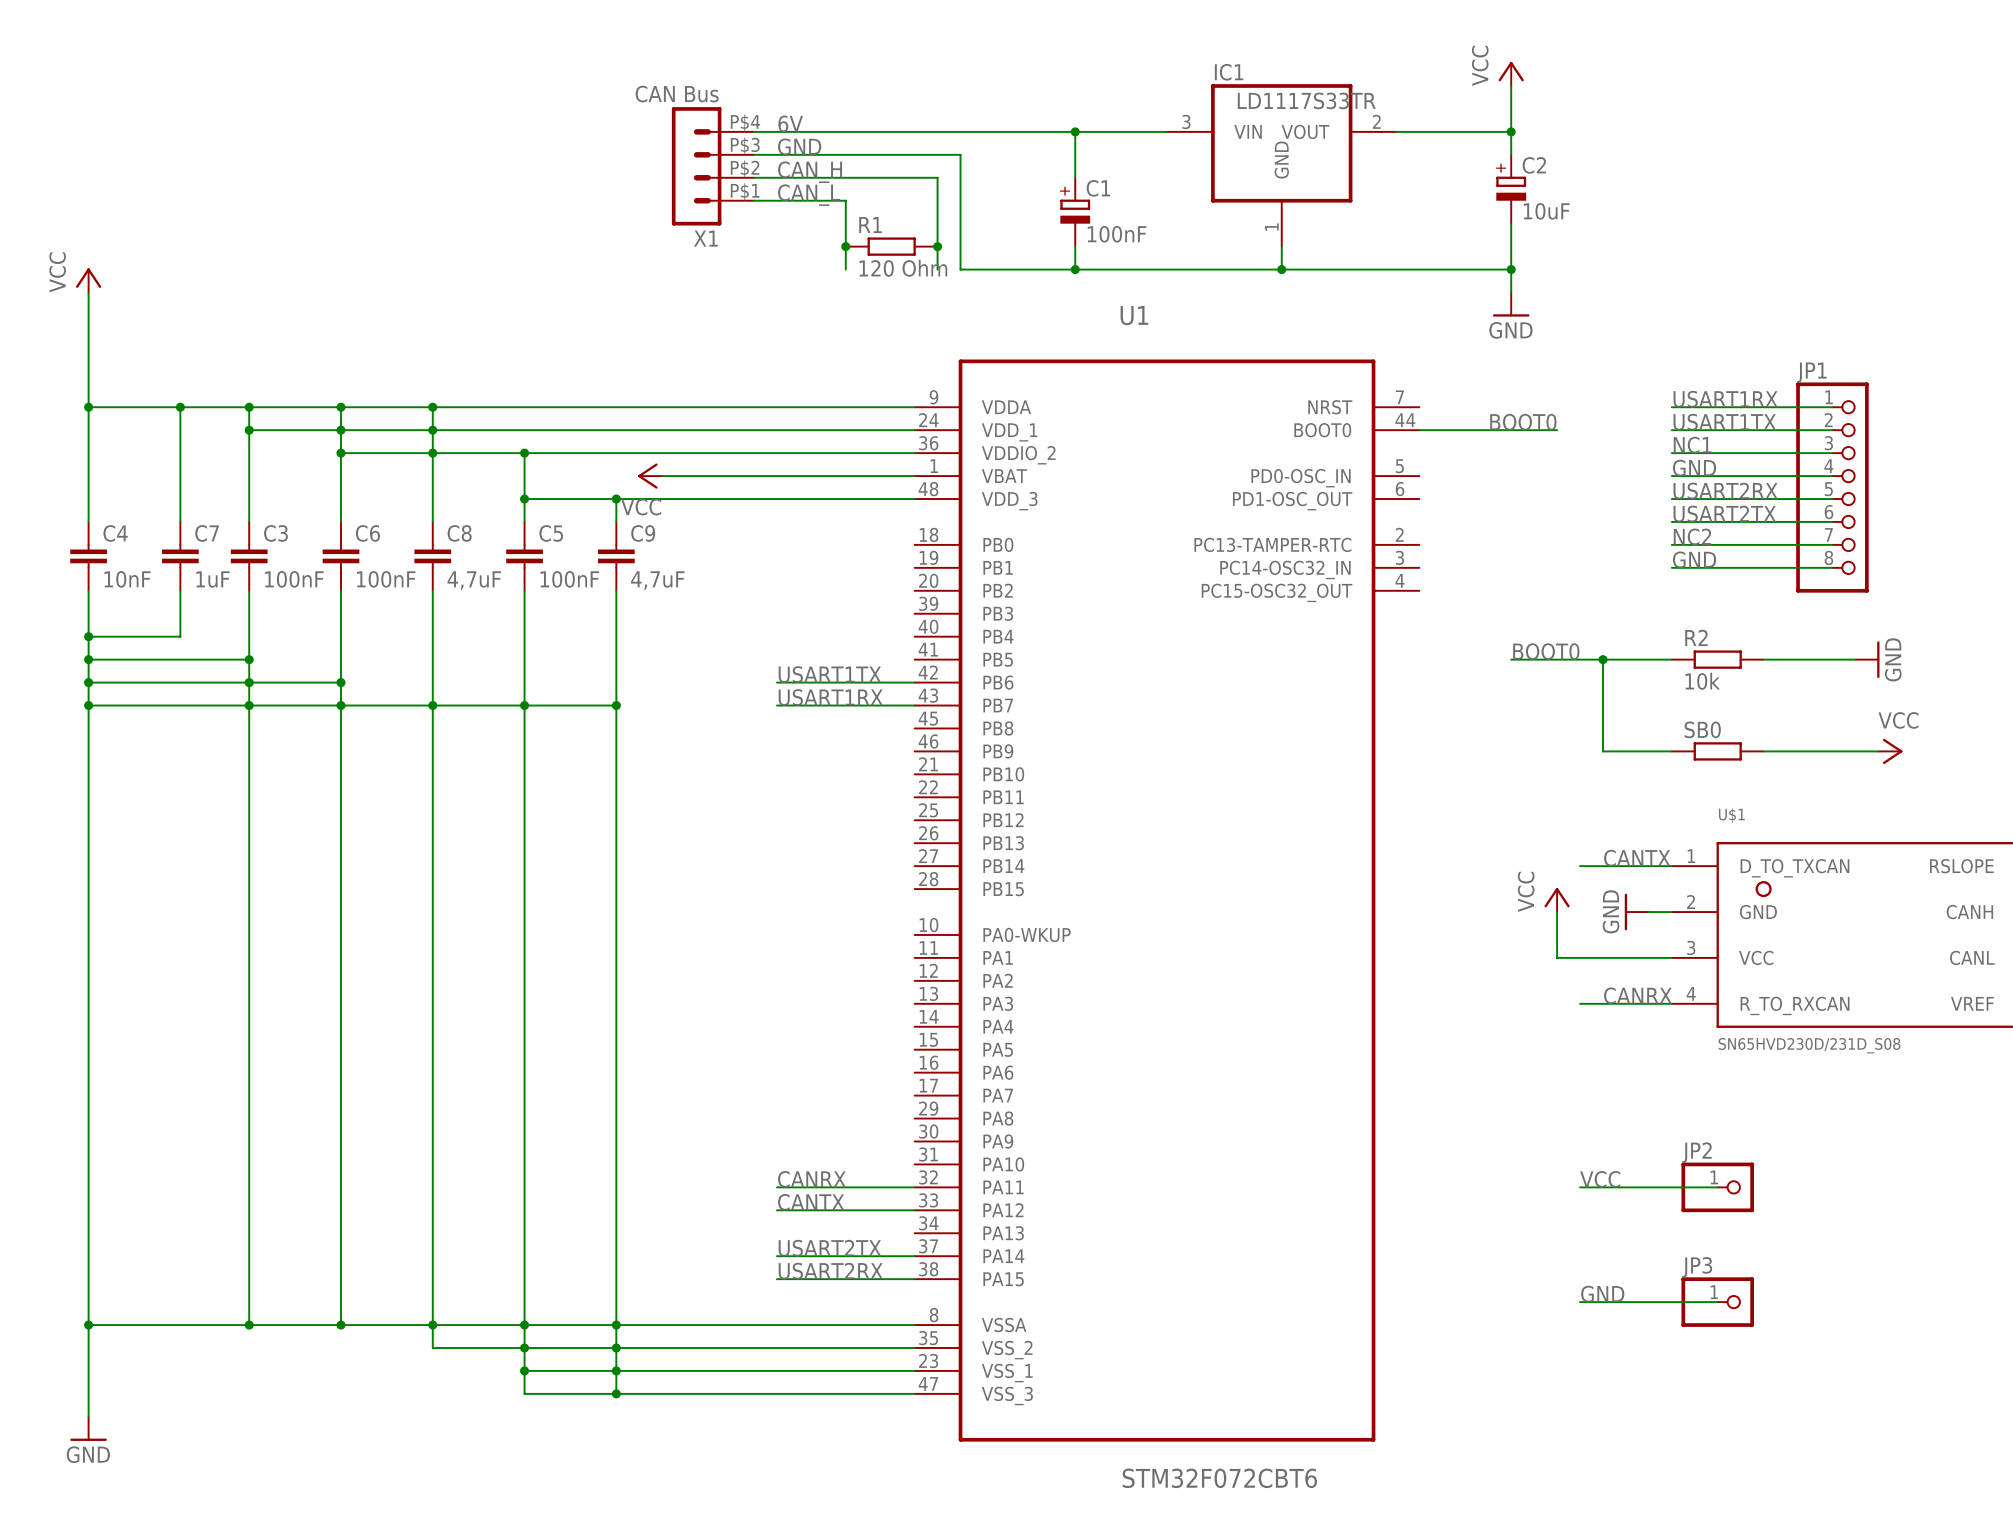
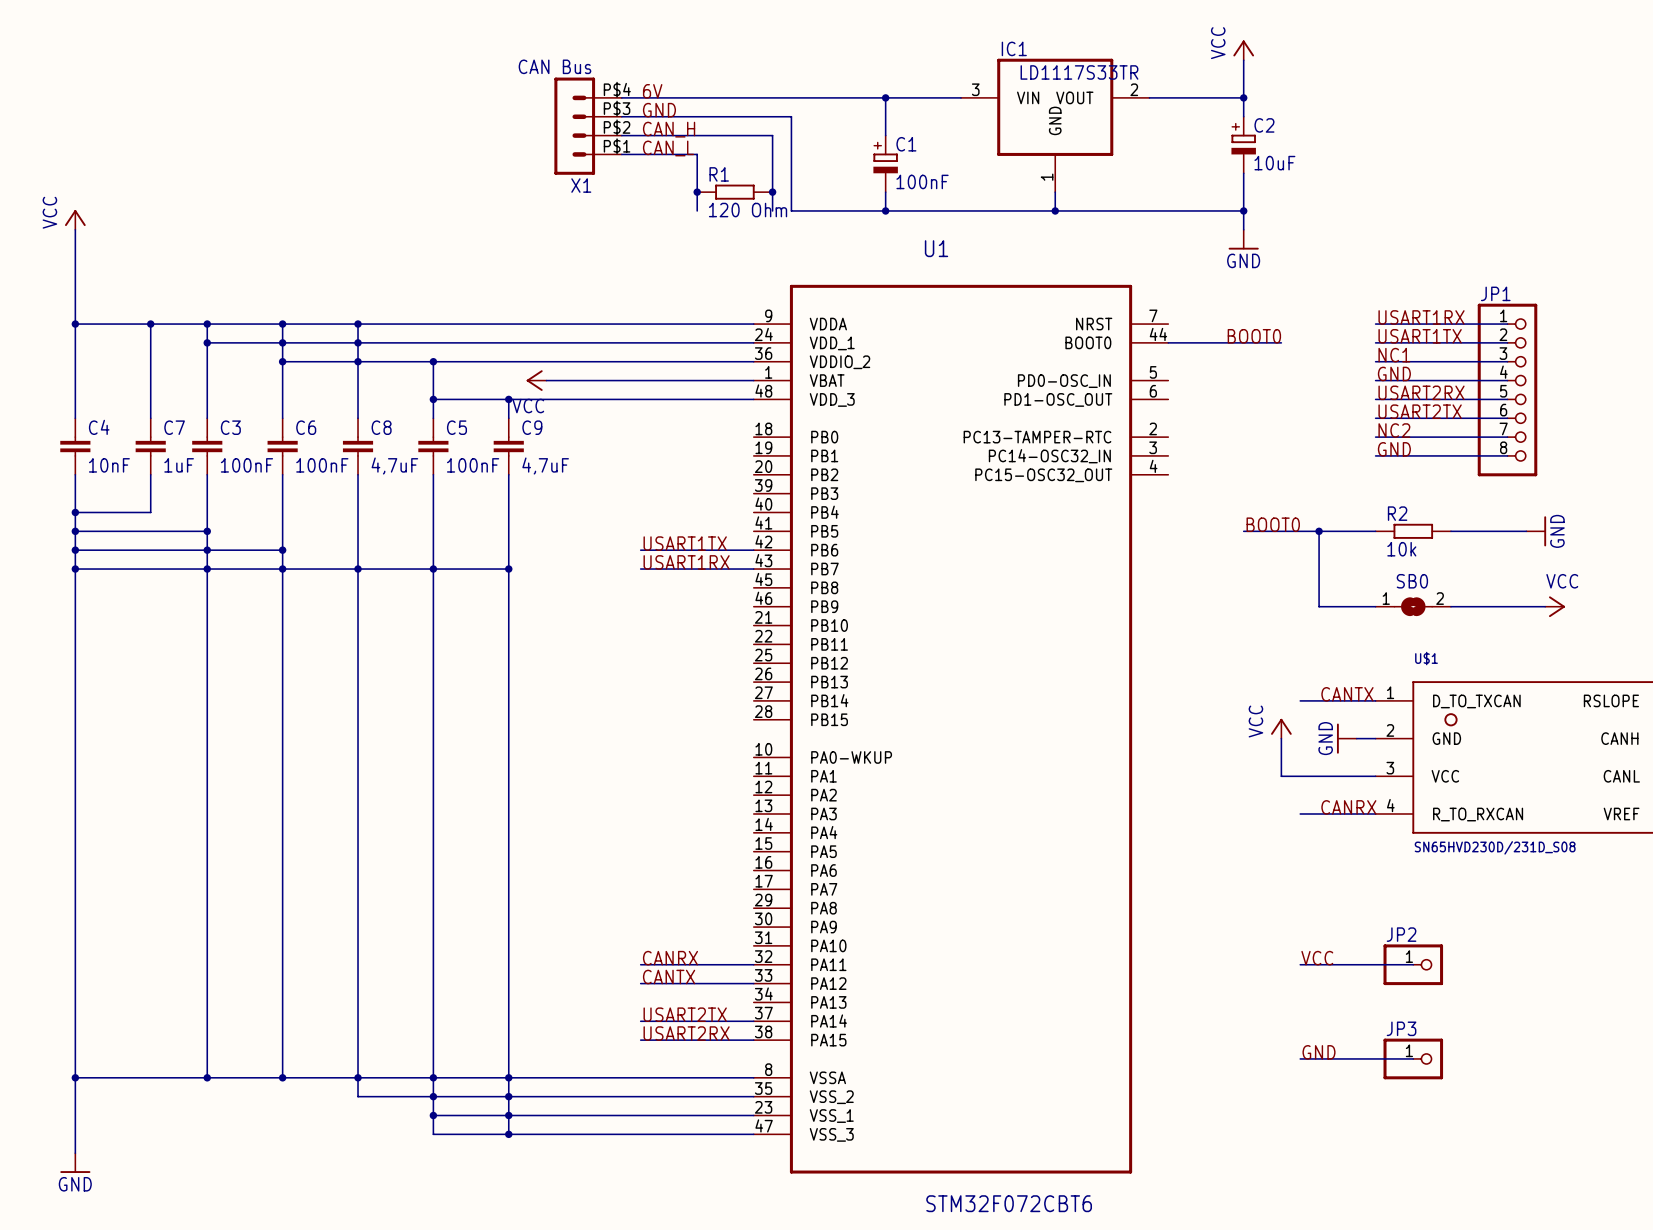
SB0 symbol: [1671, 742, 1764, 761] -> [1375, 597, 1451, 617]

